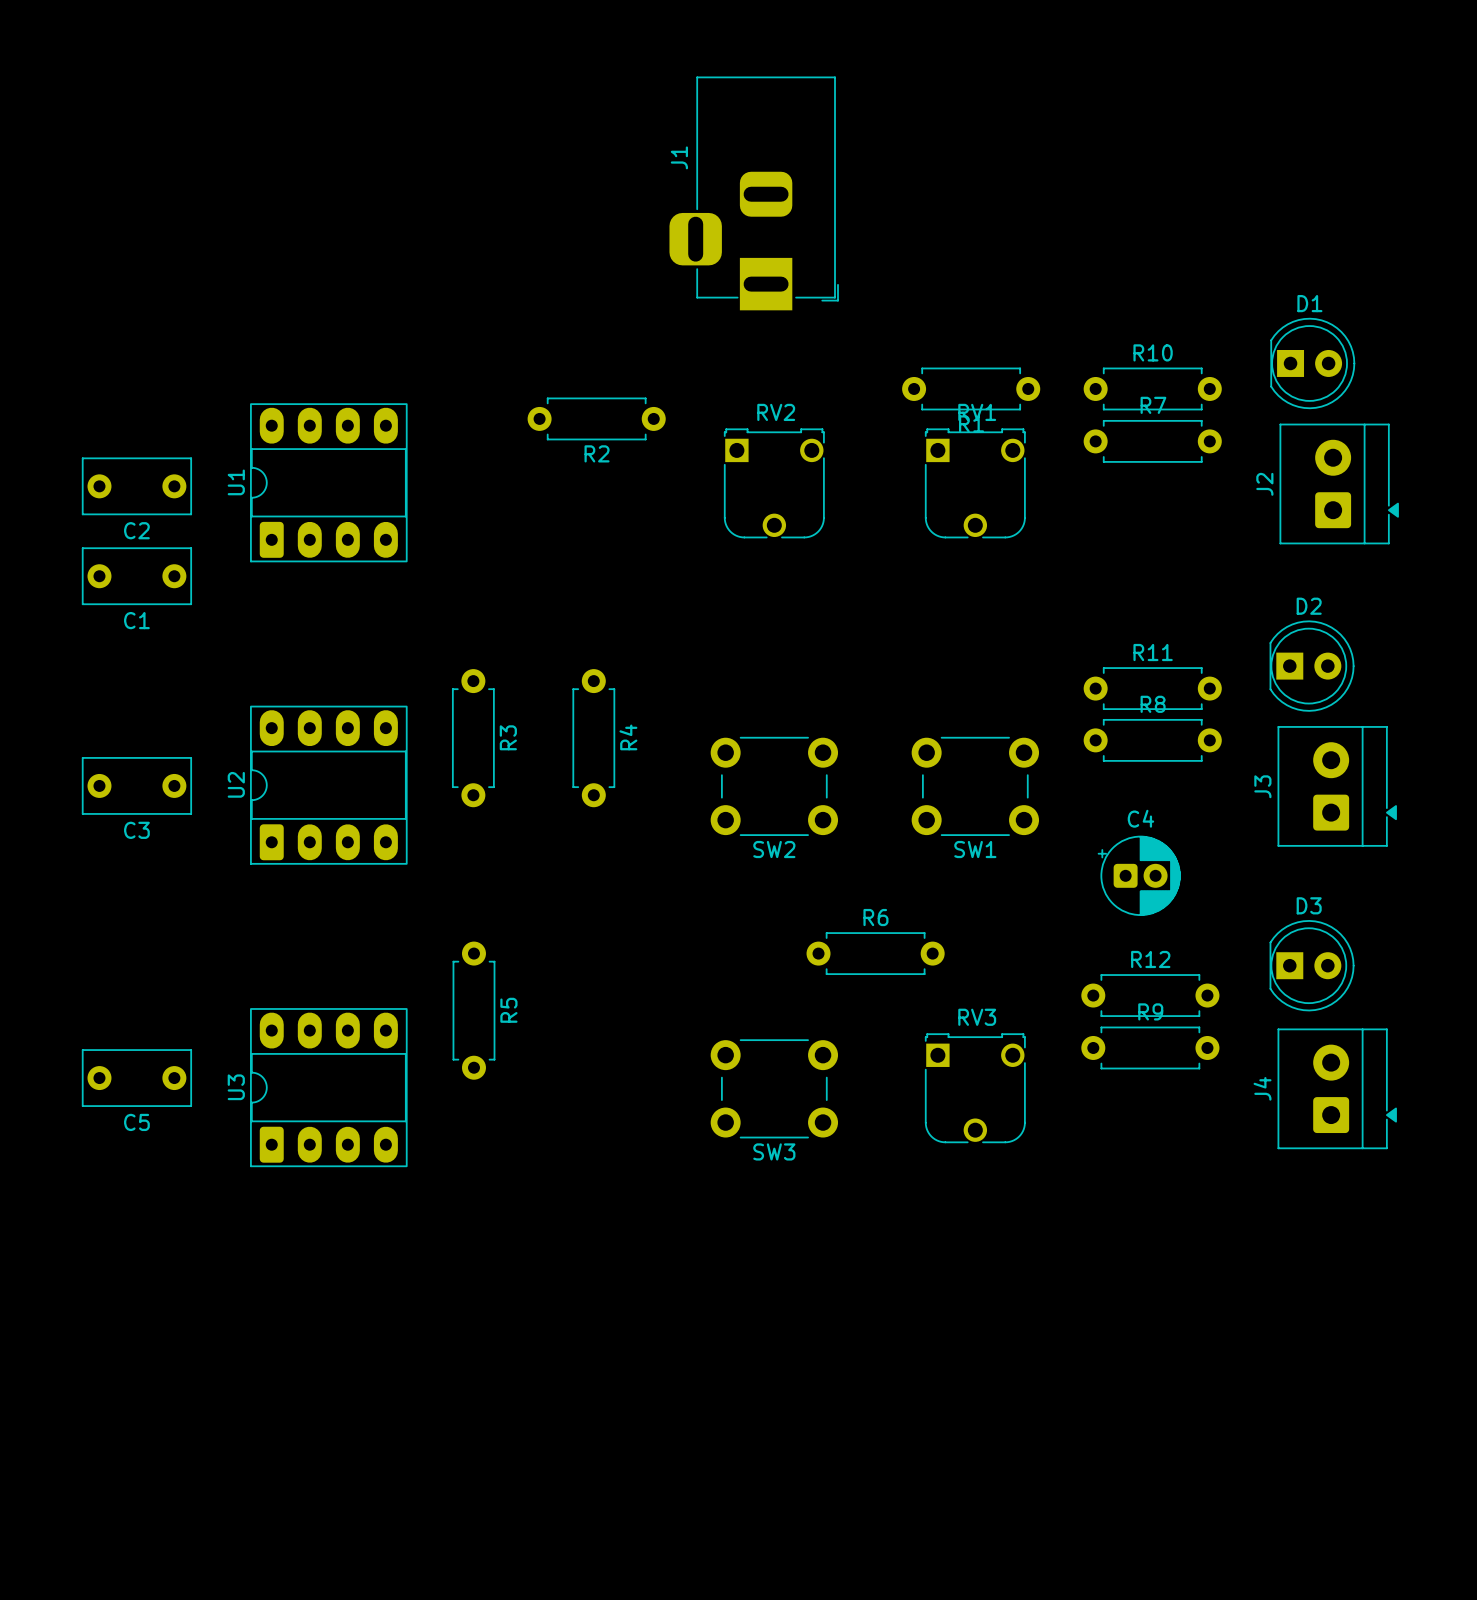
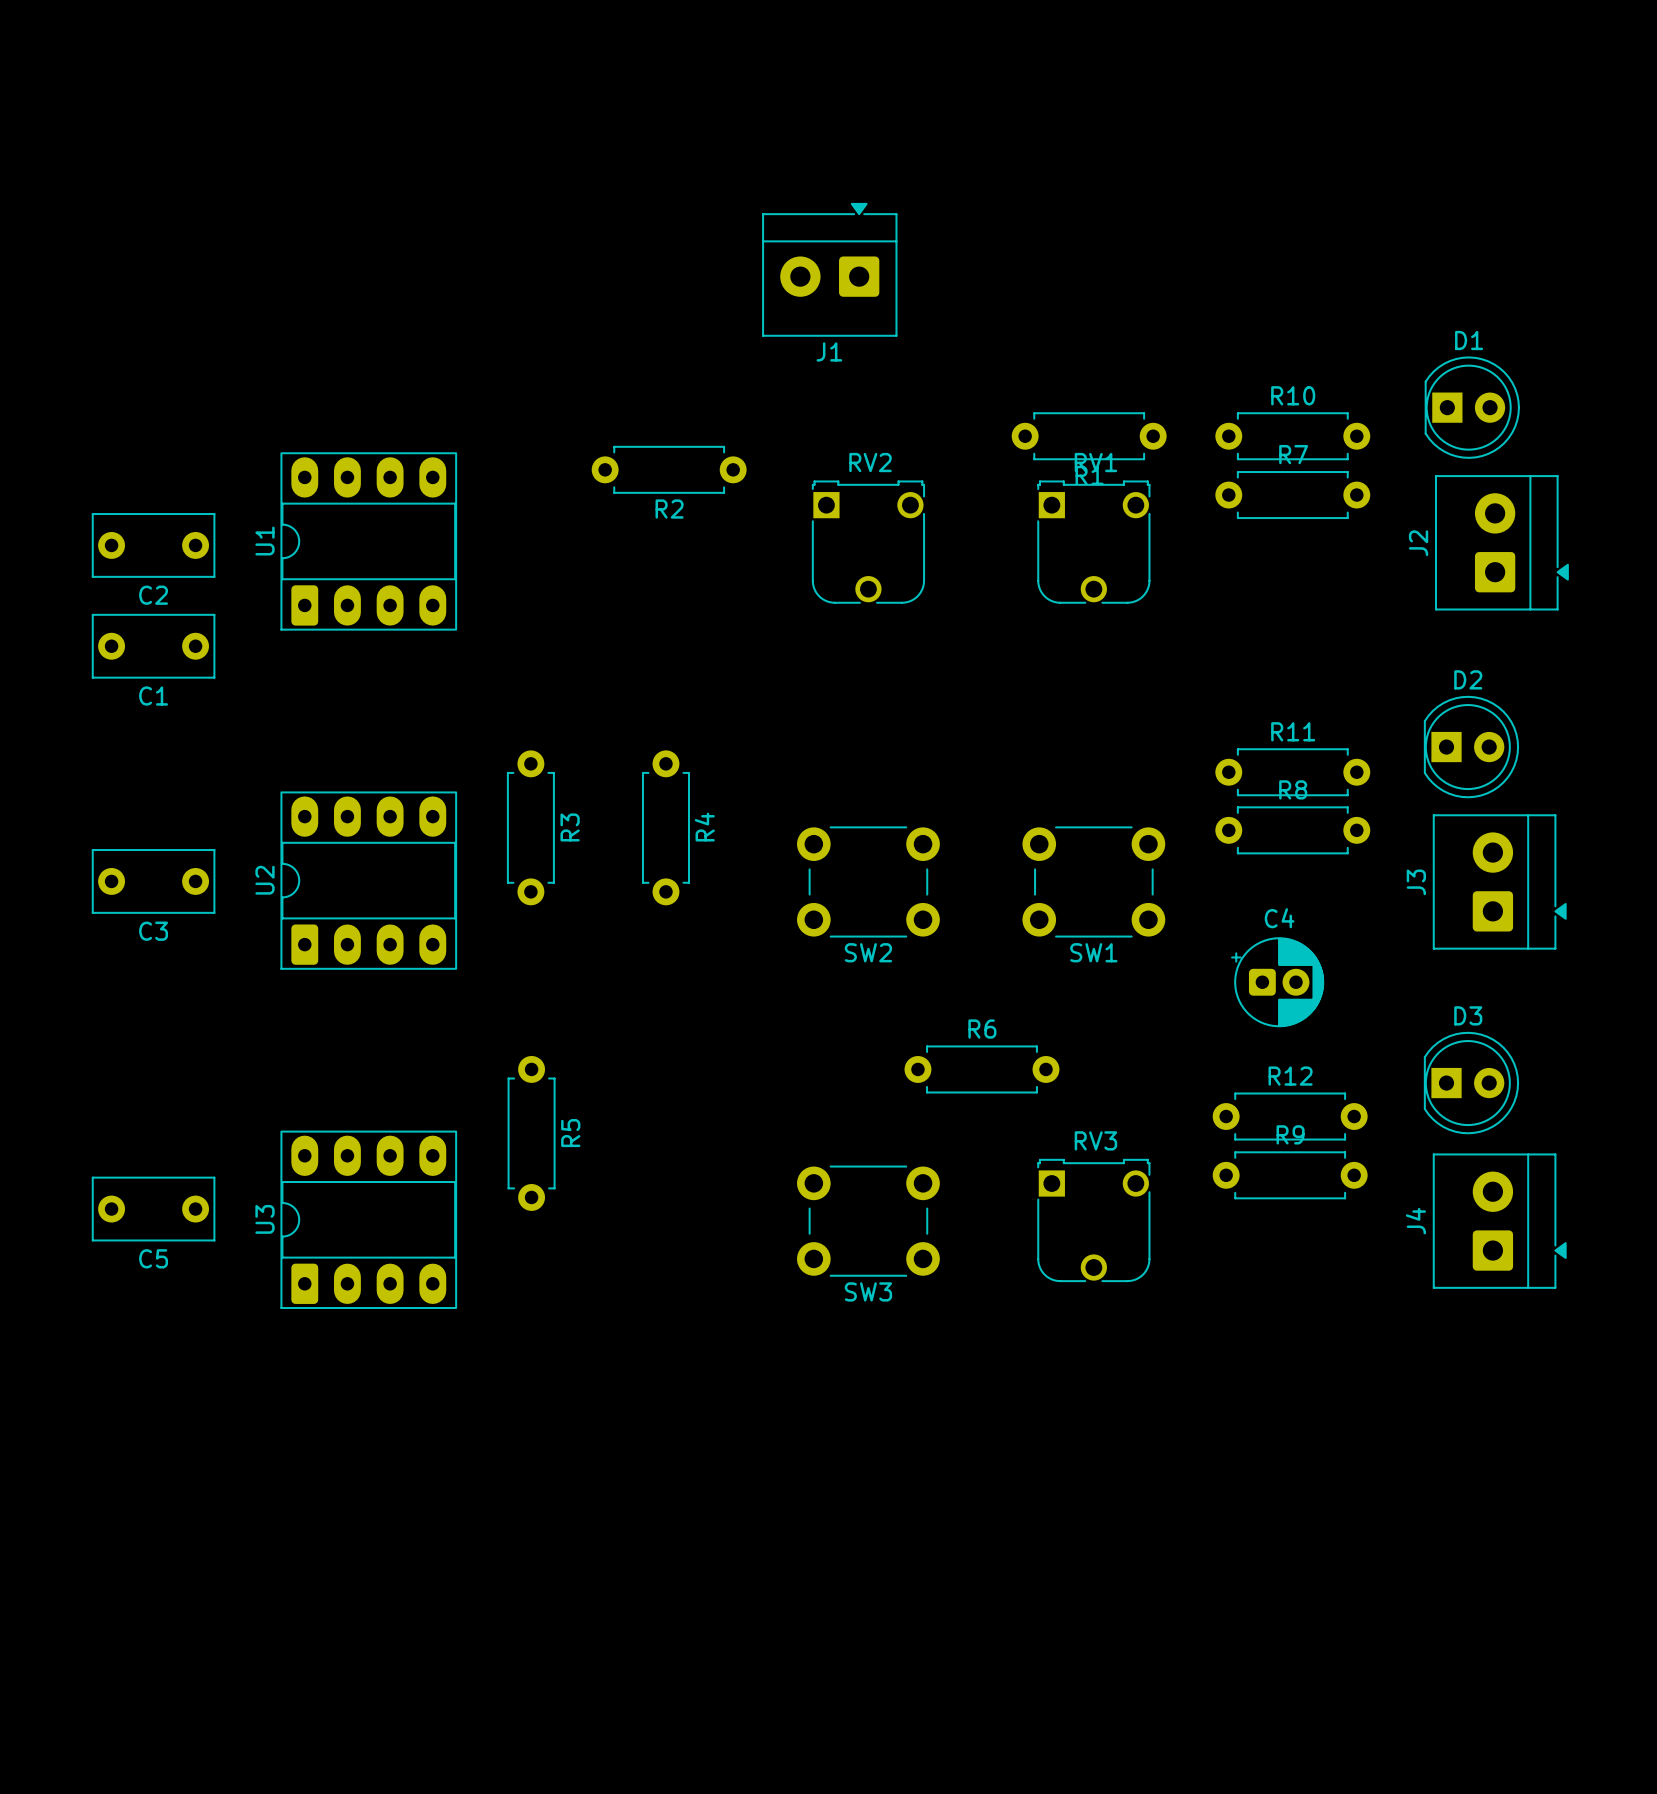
J1 footprint: [669, 76, 839, 311] -> [762, 202, 898, 337]
J1 name position: J1 (679, 157) -> J1 (829, 351)

